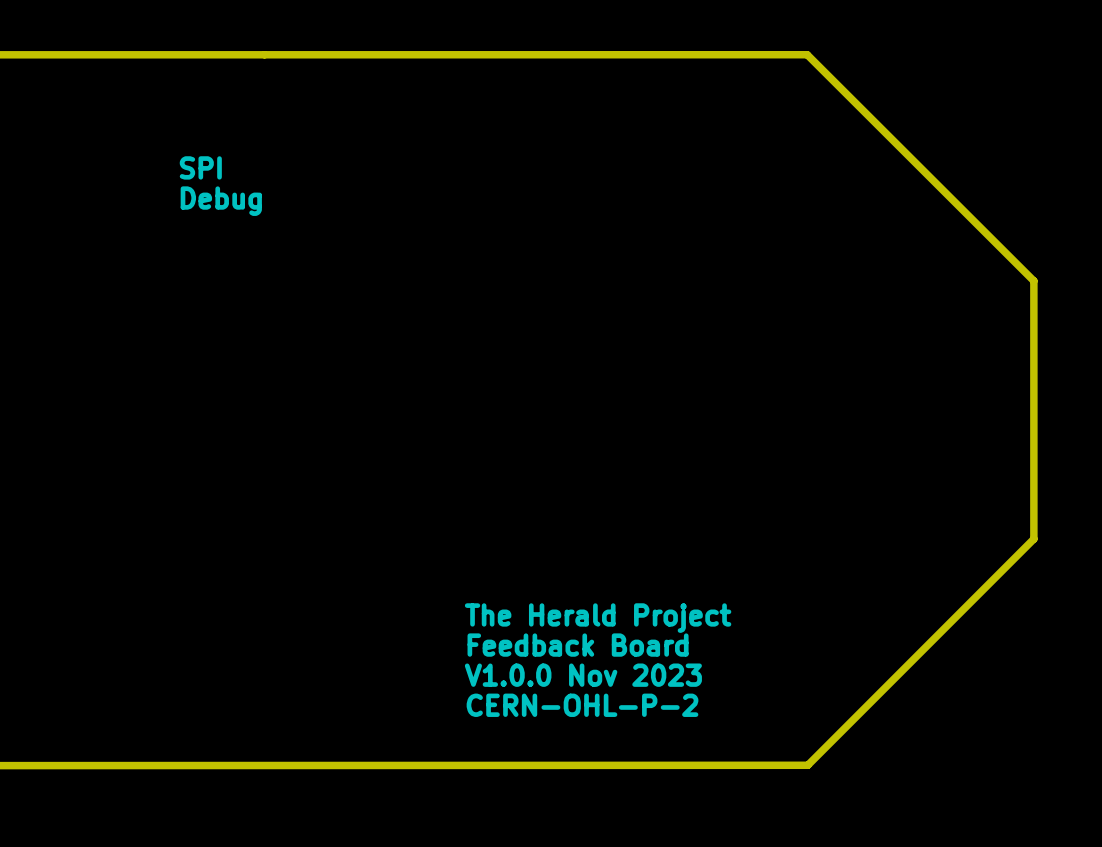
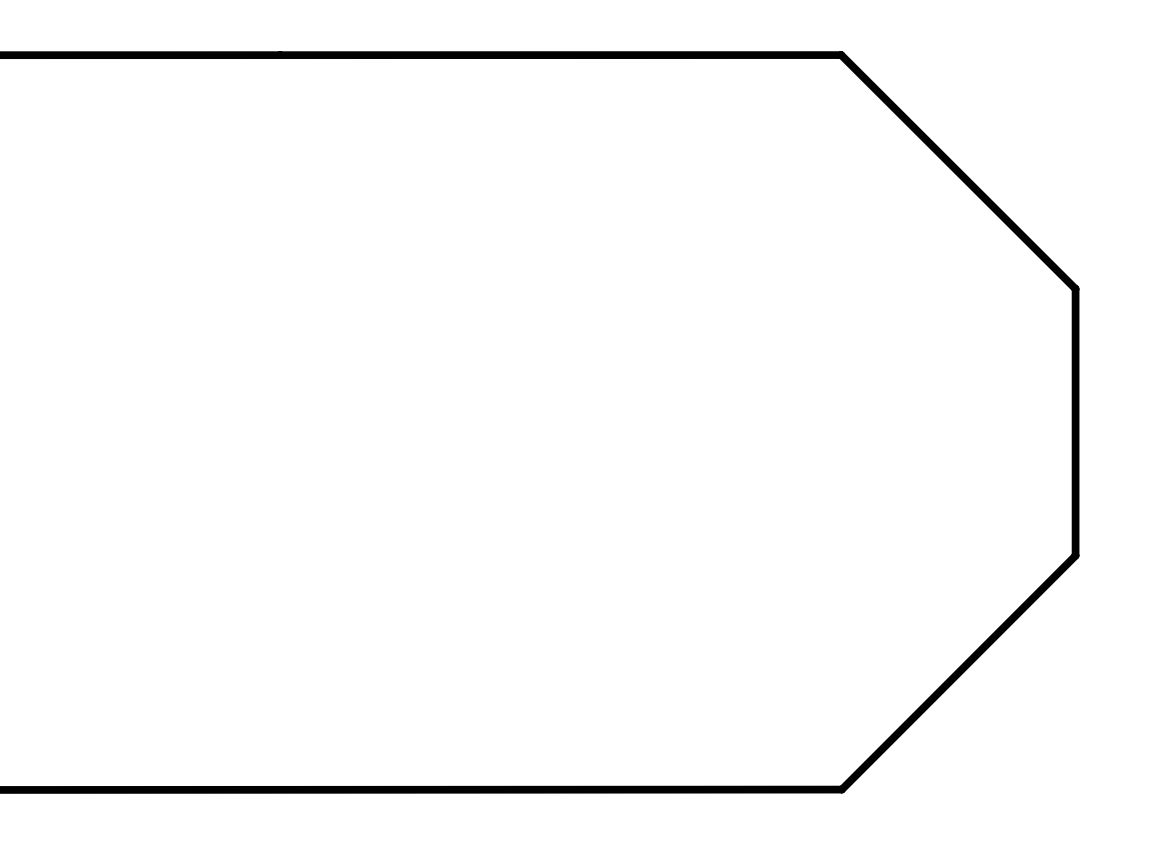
text: SPI (200, 167) -> none
text: Debug (221, 201) -> none
text: The Herald Project (598, 618) -> none
text: Feedback Board (578, 645) -> none
text: V1.0.0 Nov 2023 (583, 675) -> none
text: CERN-OHL-P-2 (582, 705) -> none

